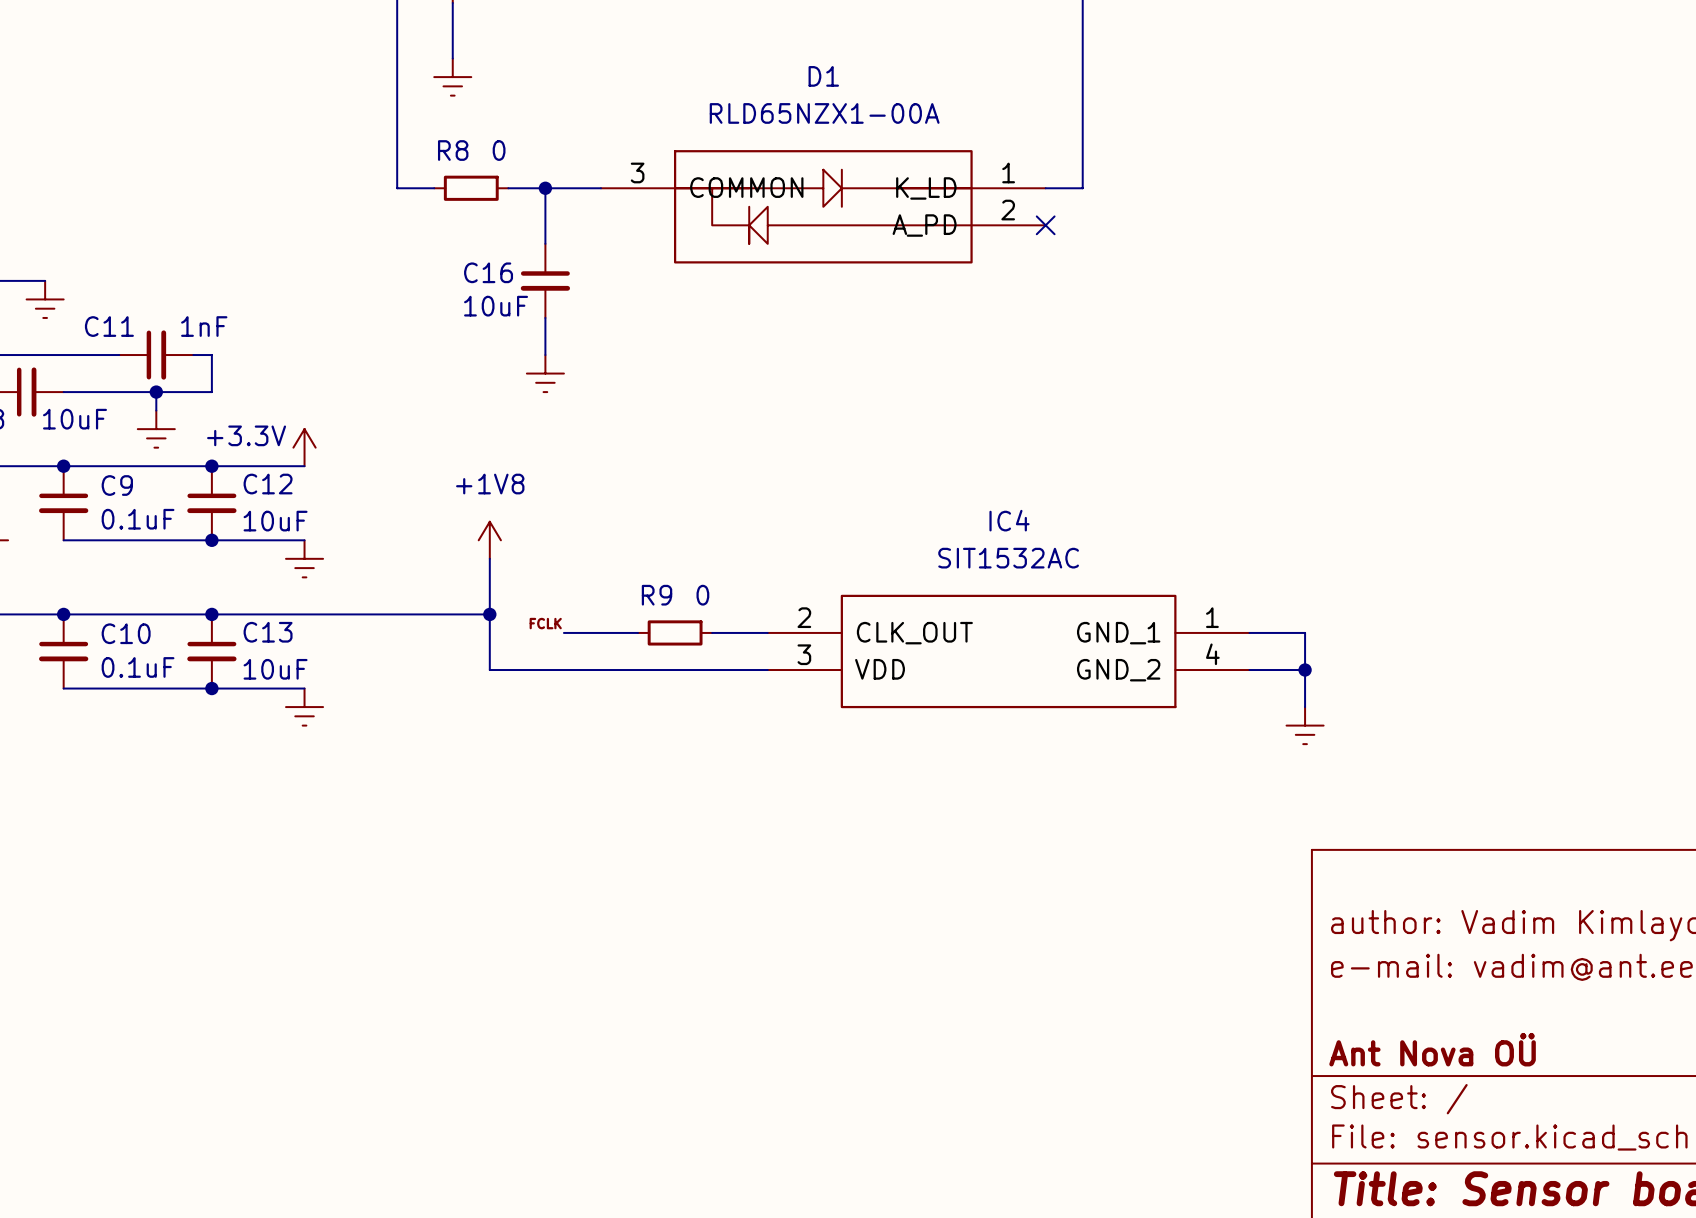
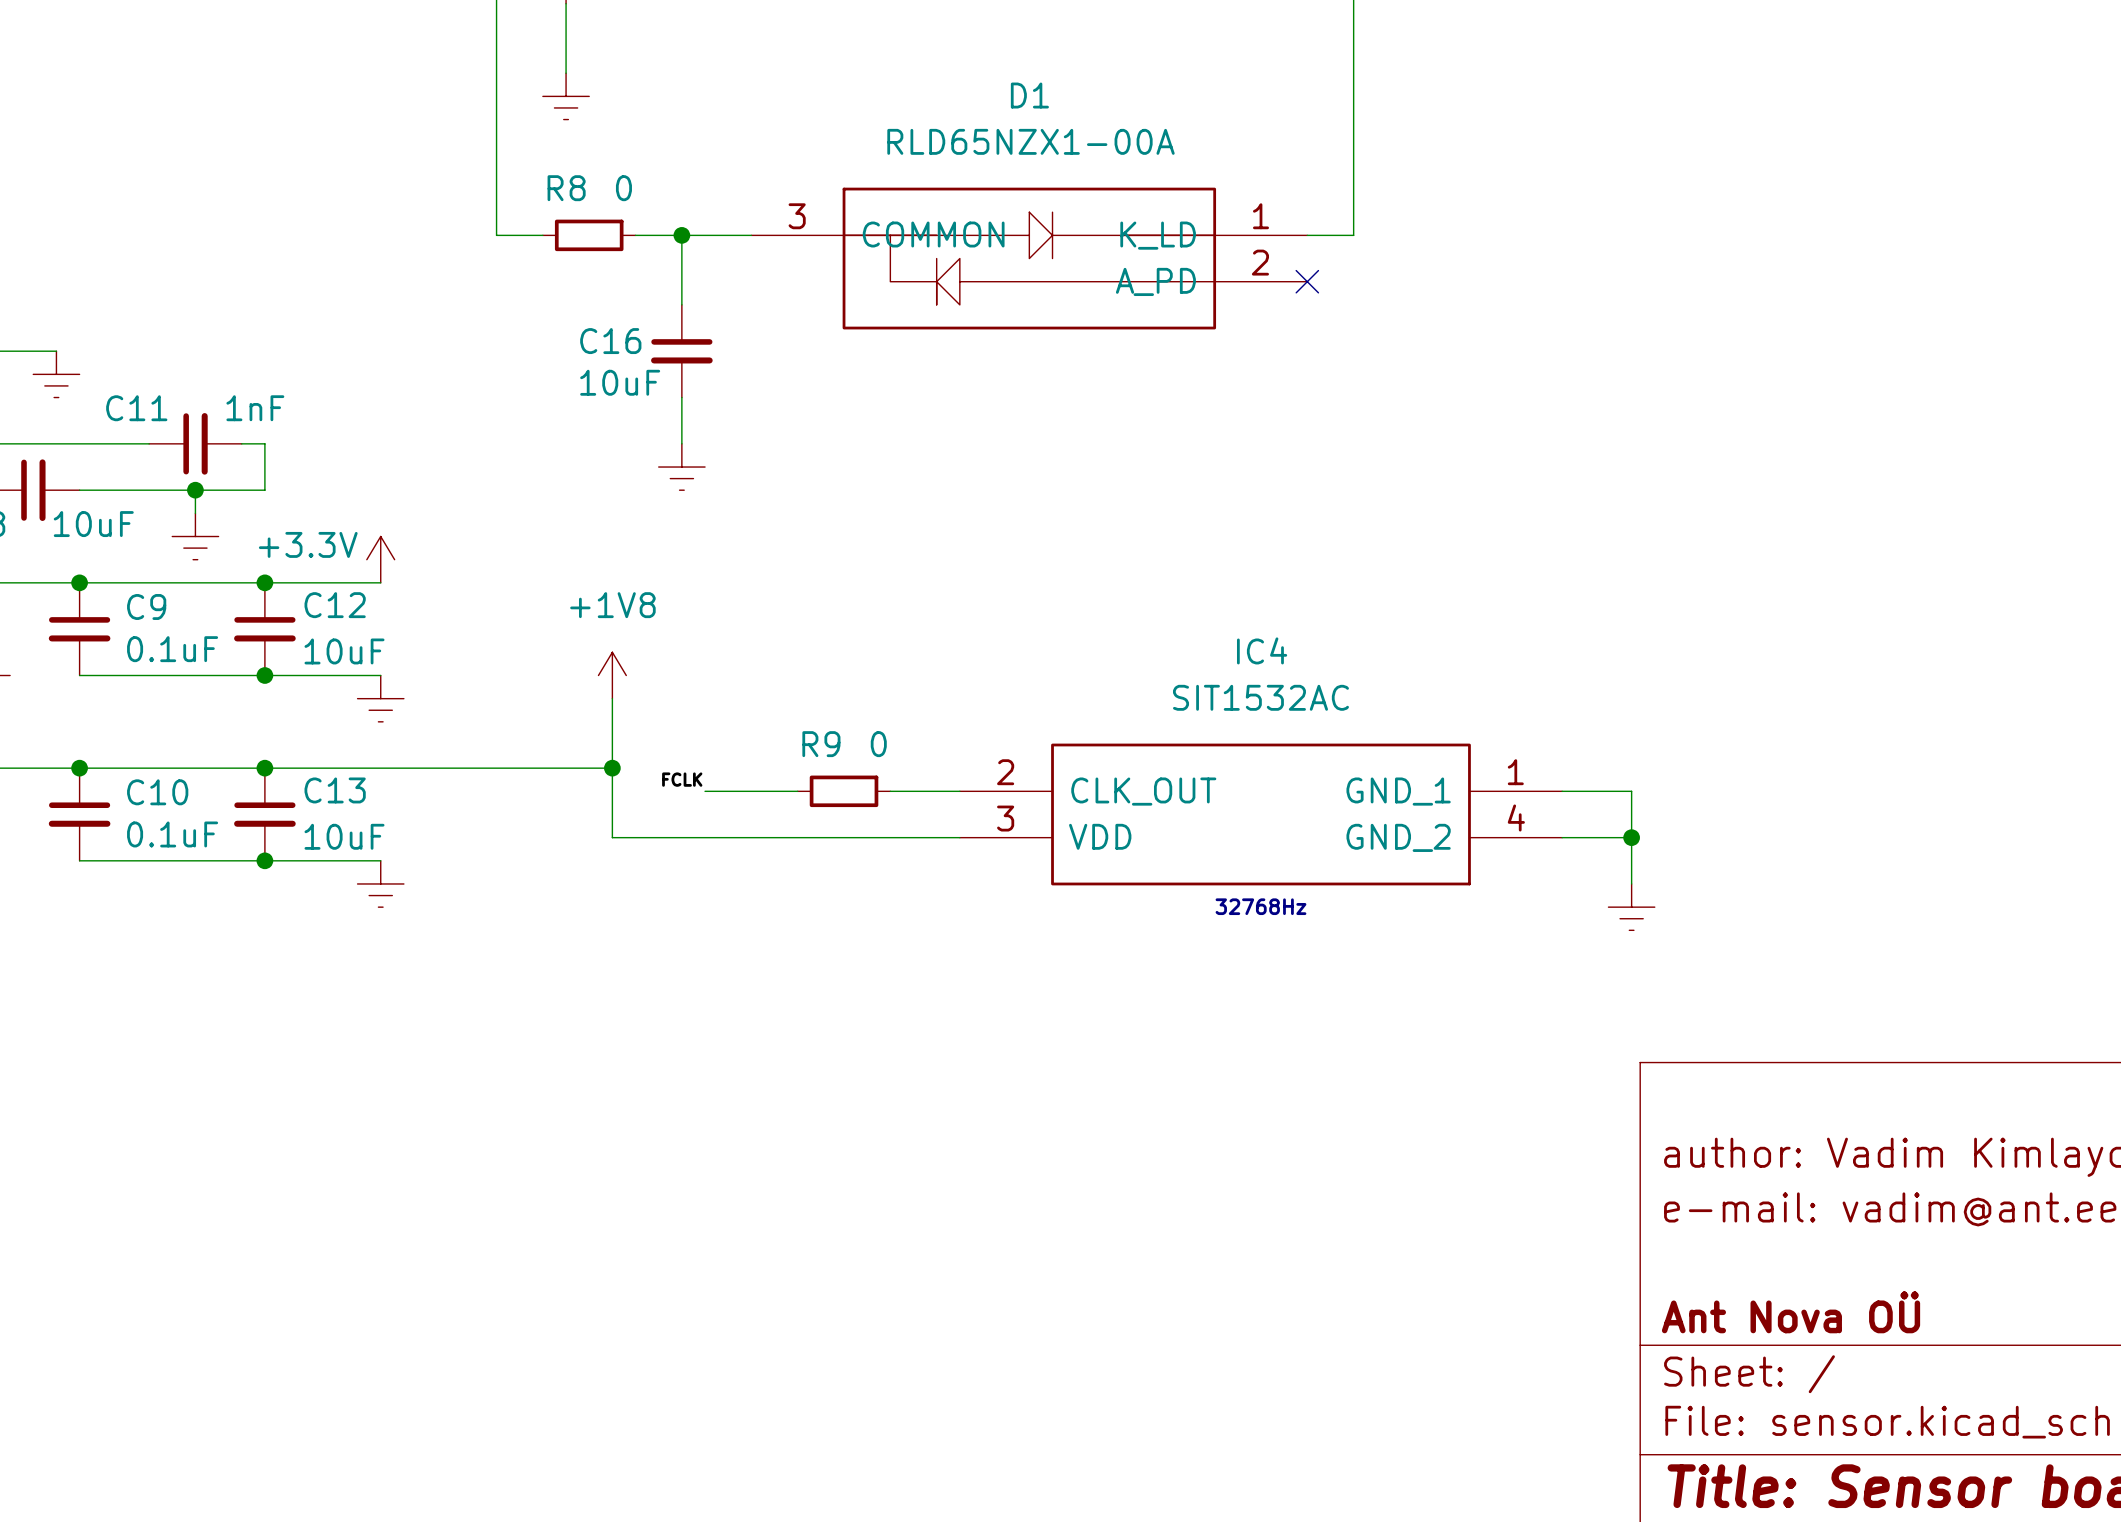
text: none -> 32768Hz (1260, 906)

